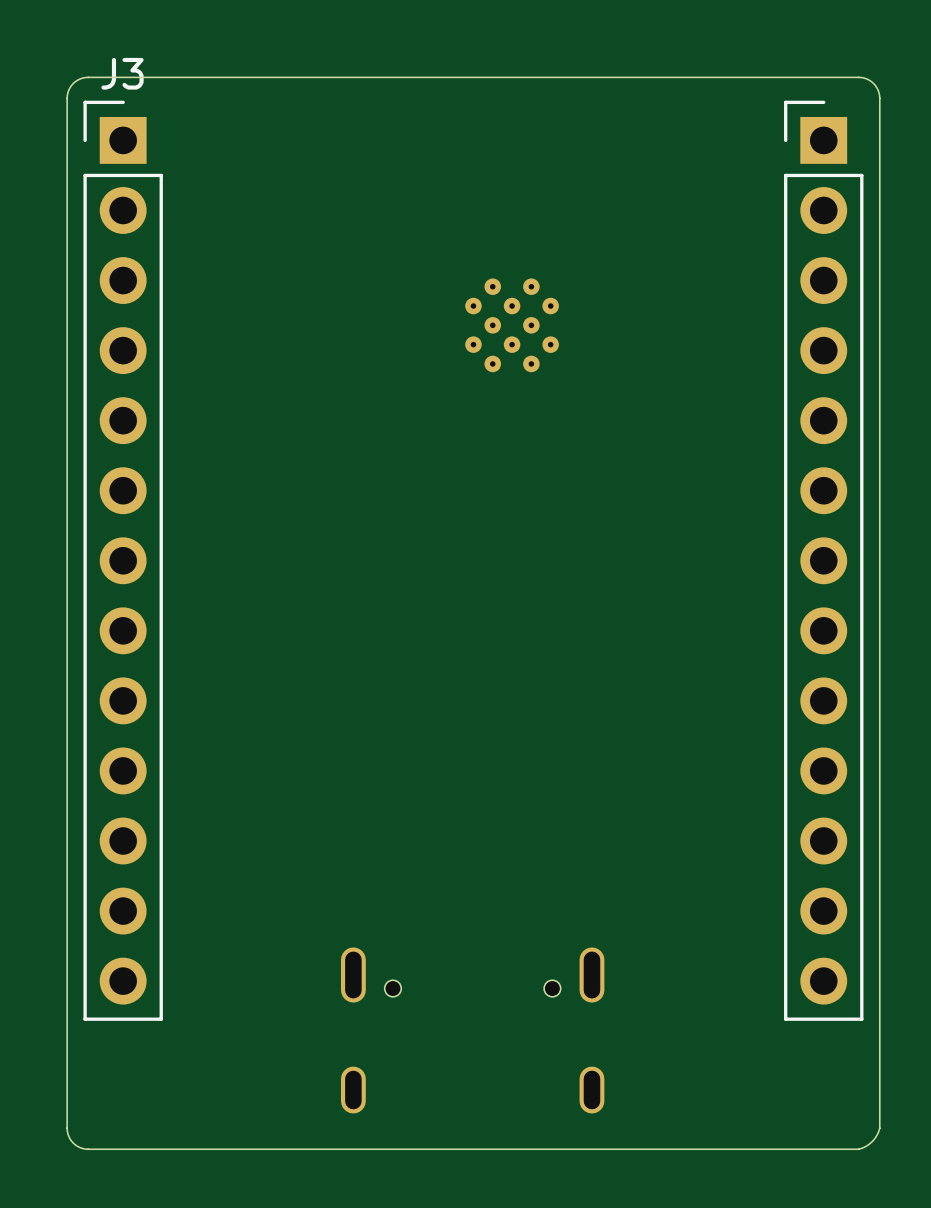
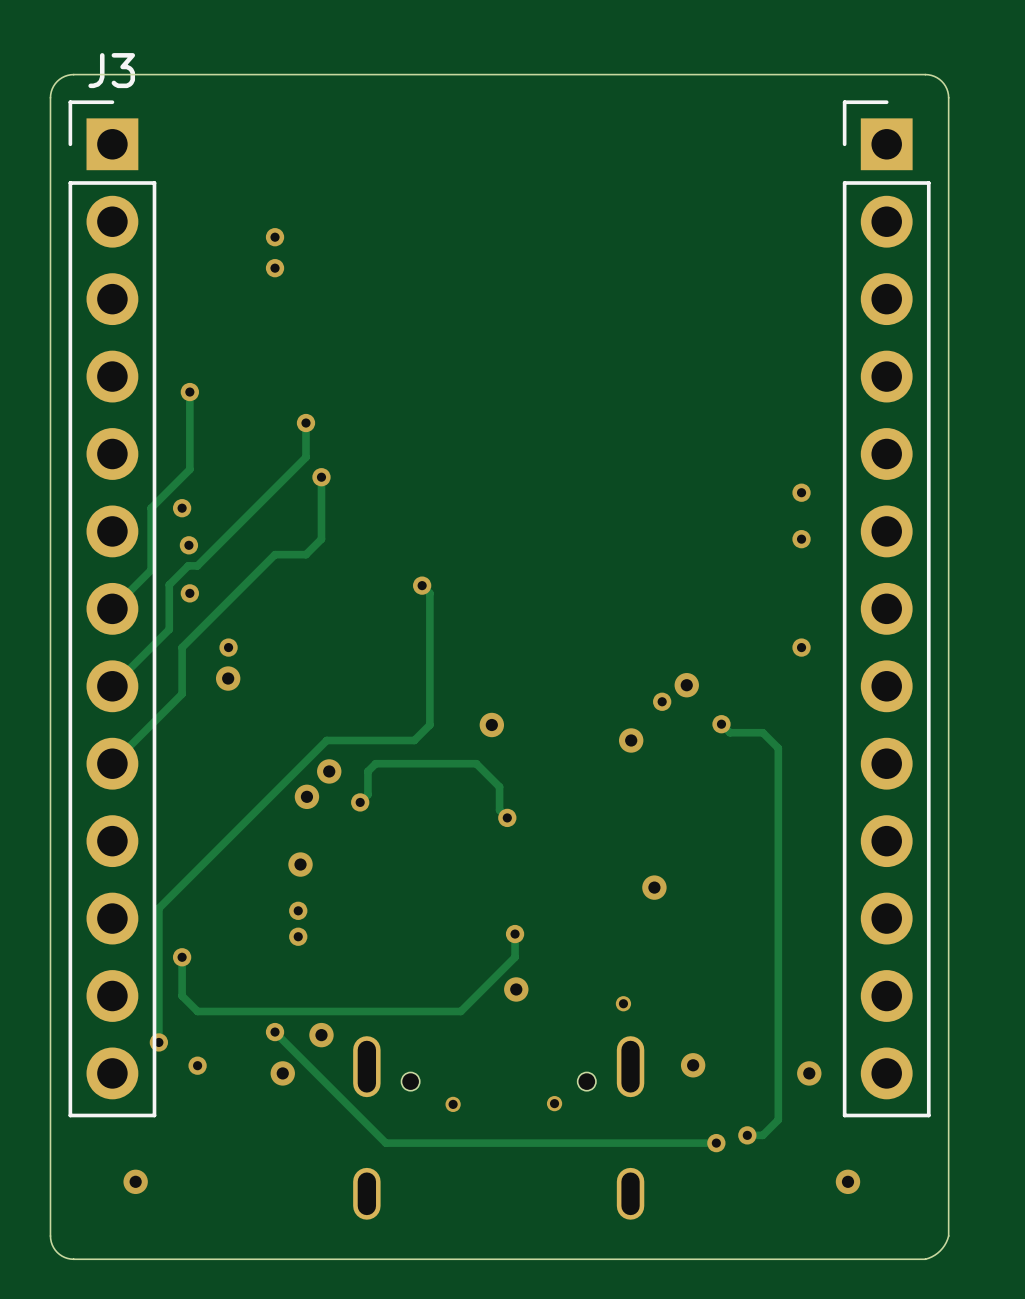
via: none -> (275, 237)
via: none -> (275, 268)
part: (512, 325) -> none
track: none -> (189, 392) (189, 469) (151, 508) (151, 570) (112, 608)
via: none -> (189, 392)
track: none -> (305, 423) (305, 457) (197, 565) (188, 565) (169, 584) (169, 629) (112, 686)
via: none -> (305, 423)
track: none -> (321, 477) (321, 539) (305, 554) (275, 554) (182, 647) (182, 694) (112, 763)
via: none -> (321, 477)
via: none -> (801, 492)
via: none -> (182, 508)
via: none -> (801, 539)
via: none -> (188, 545)
track: none -> (422, 585) (429, 593) (429, 724) (414, 740) (326, 740) (158, 908) (158, 1042)
via: none -> (422, 585)
via: none -> (189, 593)
via: none -> (228, 647)
via: none -> (801, 647)
via: none -> (228, 678)
via: none -> (686, 685)
via: none -> (662, 701)
via: none -> (491, 724)
track: none -> (721, 724) (730, 732) (762, 732) (778, 748) (778, 1119) (762, 1135) (747, 1135)
via: none -> (721, 724)
via: none -> (631, 740)
via: none -> (329, 771)
via: none -> (306, 796)
track: none -> (360, 802) (367, 794) (367, 771) (375, 763) (476, 763) (499, 786) (499, 810) (507, 817)
via: none -> (360, 802)
via: none -> (507, 817)
via: none -> (300, 864)
via: none -> (654, 887)
via: none -> (298, 910)
track: none -> (515, 934) (515, 957) (460, 1011) (197, 1011) (182, 996) (182, 957)
via: none -> (515, 934)
via: none -> (298, 936)
via: none -> (182, 957)
via: none -> (516, 989)
via: none -> (623, 1003)
track: none -> (275, 1032) (385, 1143) (716, 1143)
via: none -> (275, 1032)
via: none -> (321, 1035)
via: none -> (158, 1042)
via: none -> (693, 1065)
via: none -> (197, 1065)
via: none -> (282, 1073)
via: none -> (809, 1073)
via: none -> (554, 1103)
via: none -> (453, 1104)
via: none -> (747, 1135)
via: none -> (716, 1143)
via: none -> (135, 1181)
via: none -> (847, 1181)

